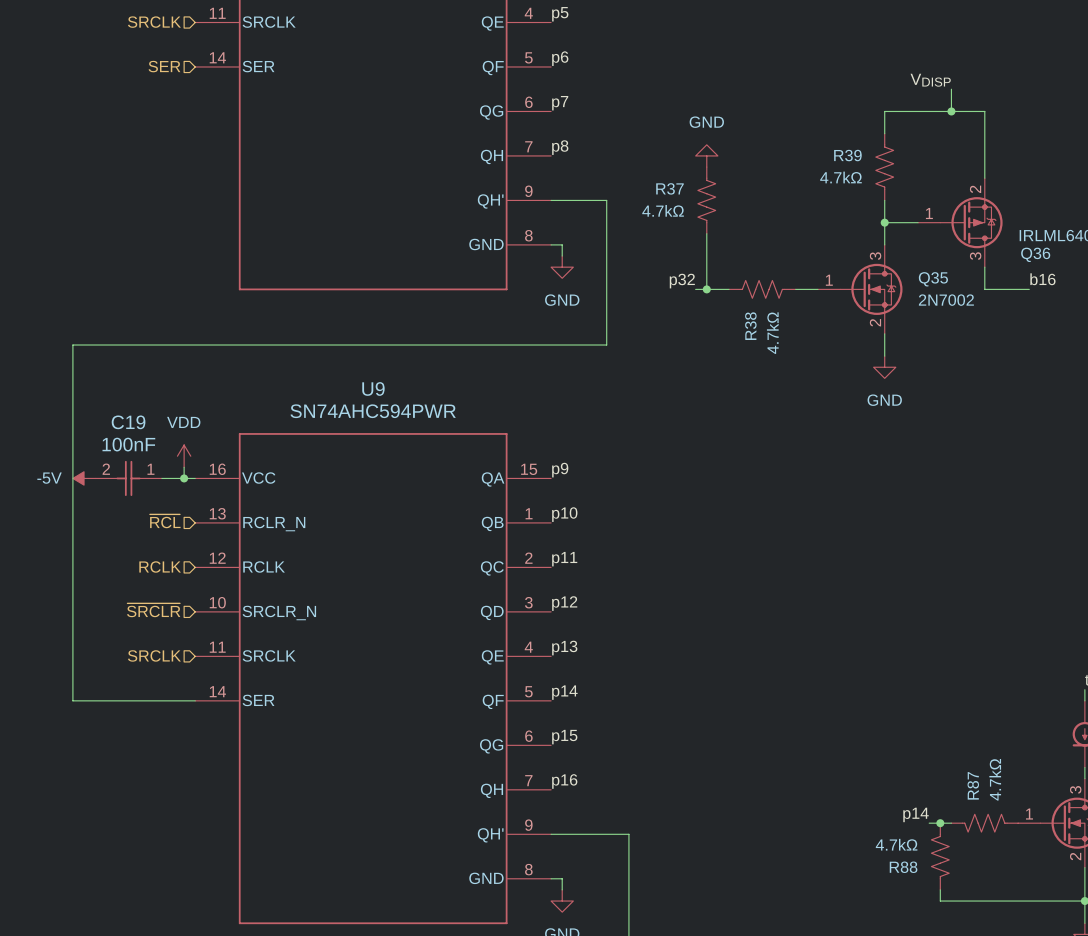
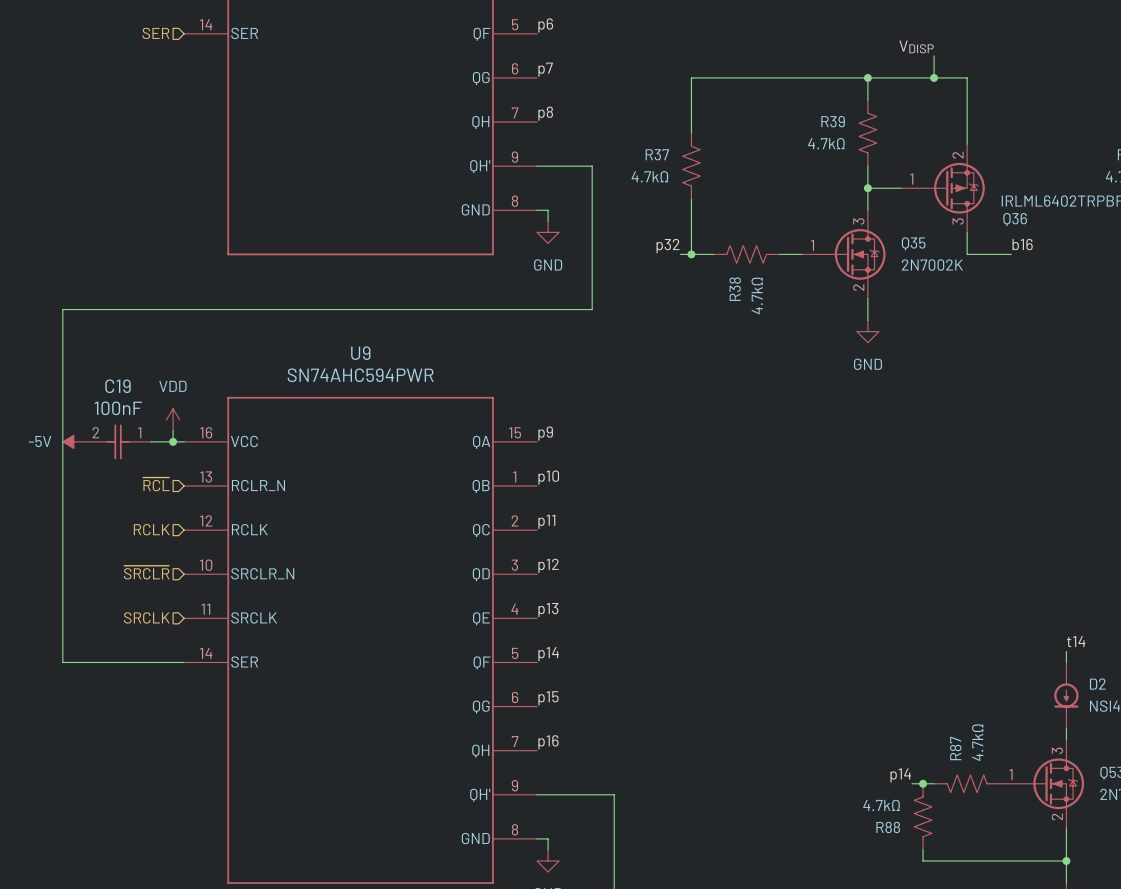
wire: none -> (867, 77) (691, 77) (691, 133)
junction: none -> (867, 77)
power symbol: GND (706, 155) -> none
Q35 value: 2N7002 (946, 300) -> 2N7002K (932, 265)

